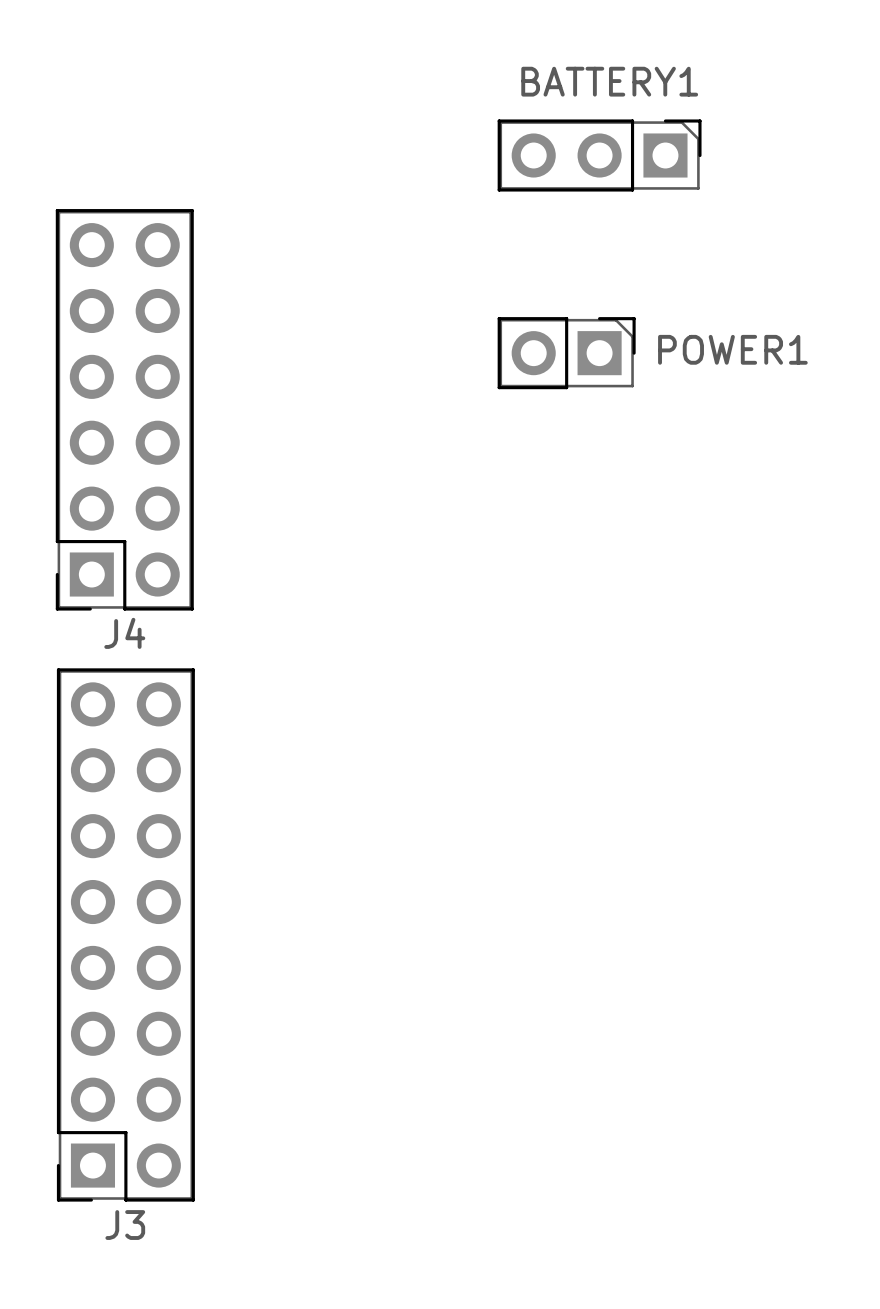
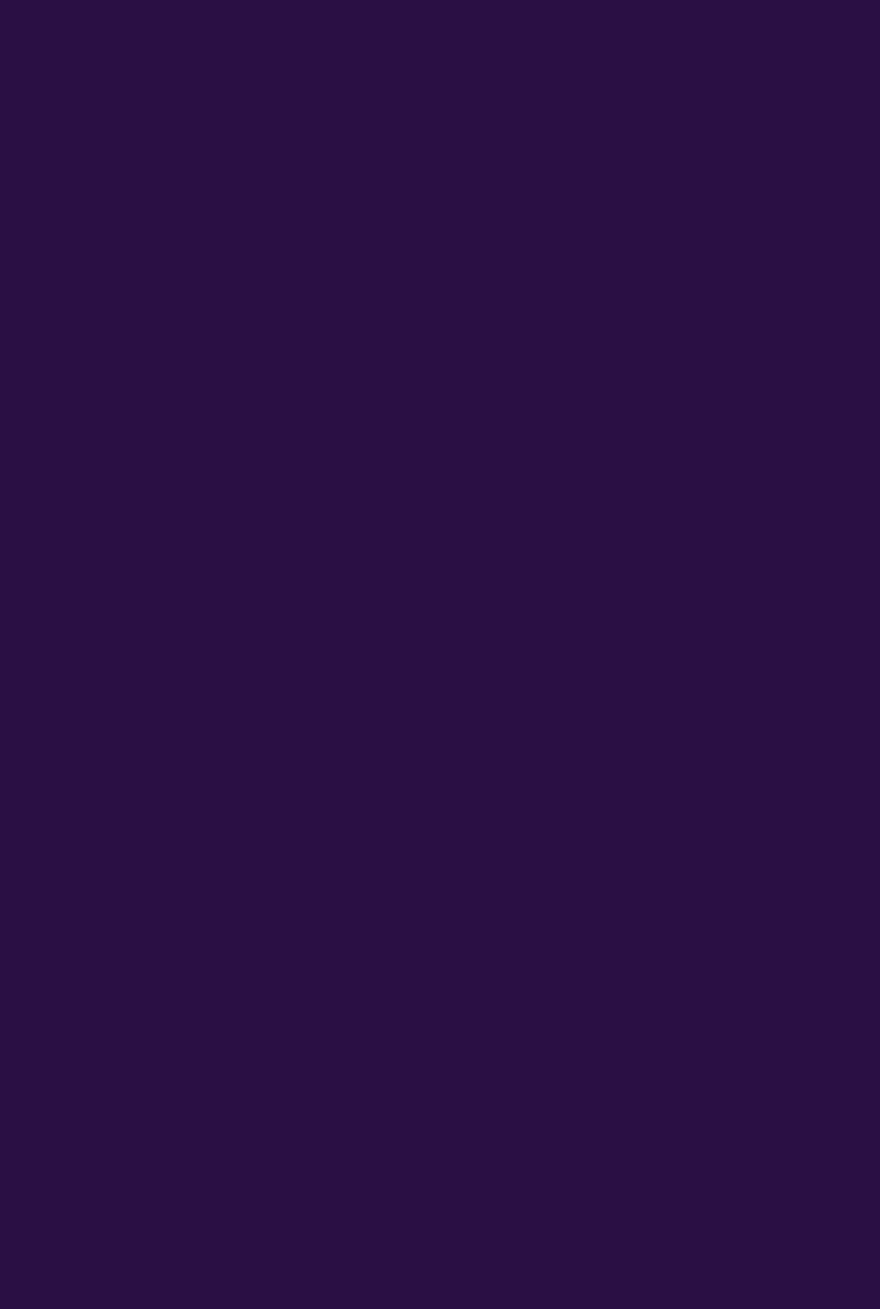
BATTERY1: (599, 155) -> none
POWER1: (566, 353) -> none
J4: (124, 409) -> none
J3: (125, 934) -> none

